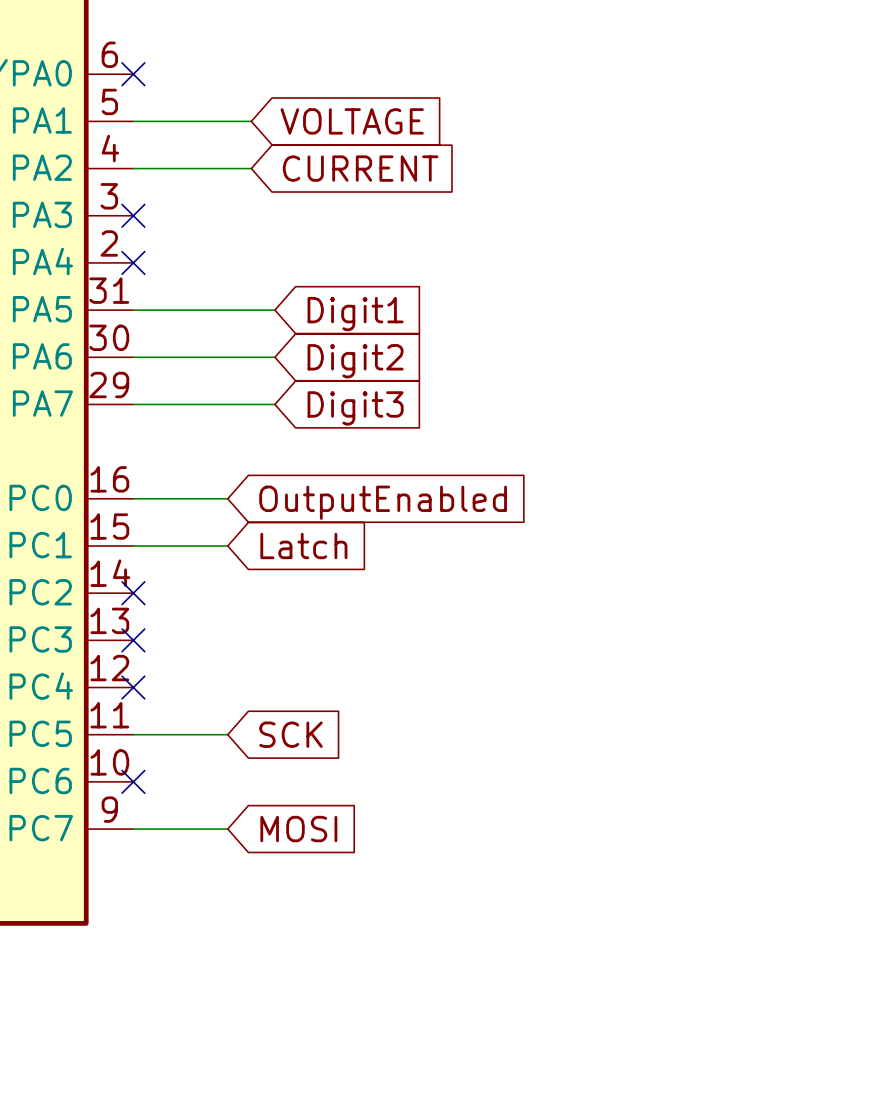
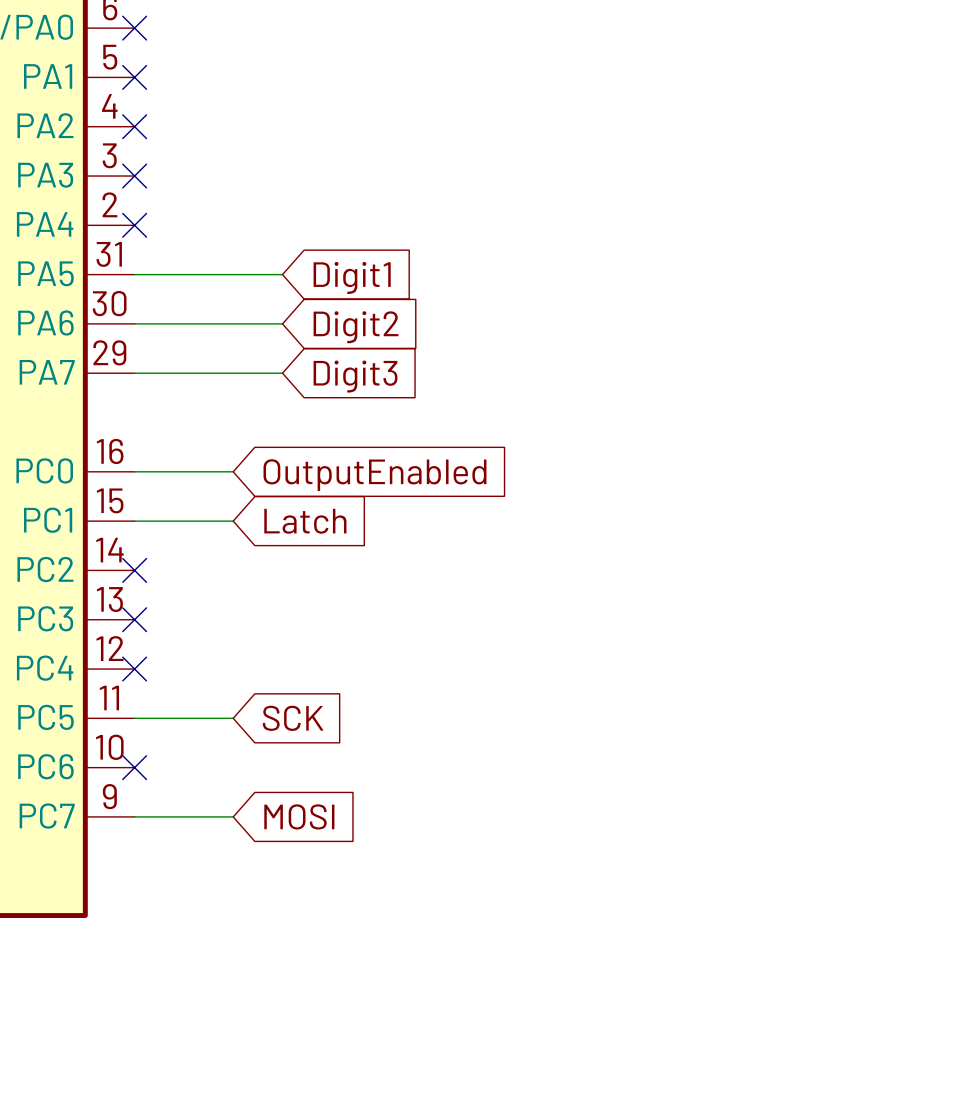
wire: (133, 121) (251, 121) -> none
no-connect mark: none -> (134, 77)
global label: VOLTAGE (352, 121) -> none
wire: (133, 168) (251, 168) -> none
no-connect mark: none -> (134, 126)
global label: CURRENT (360, 168) -> none

